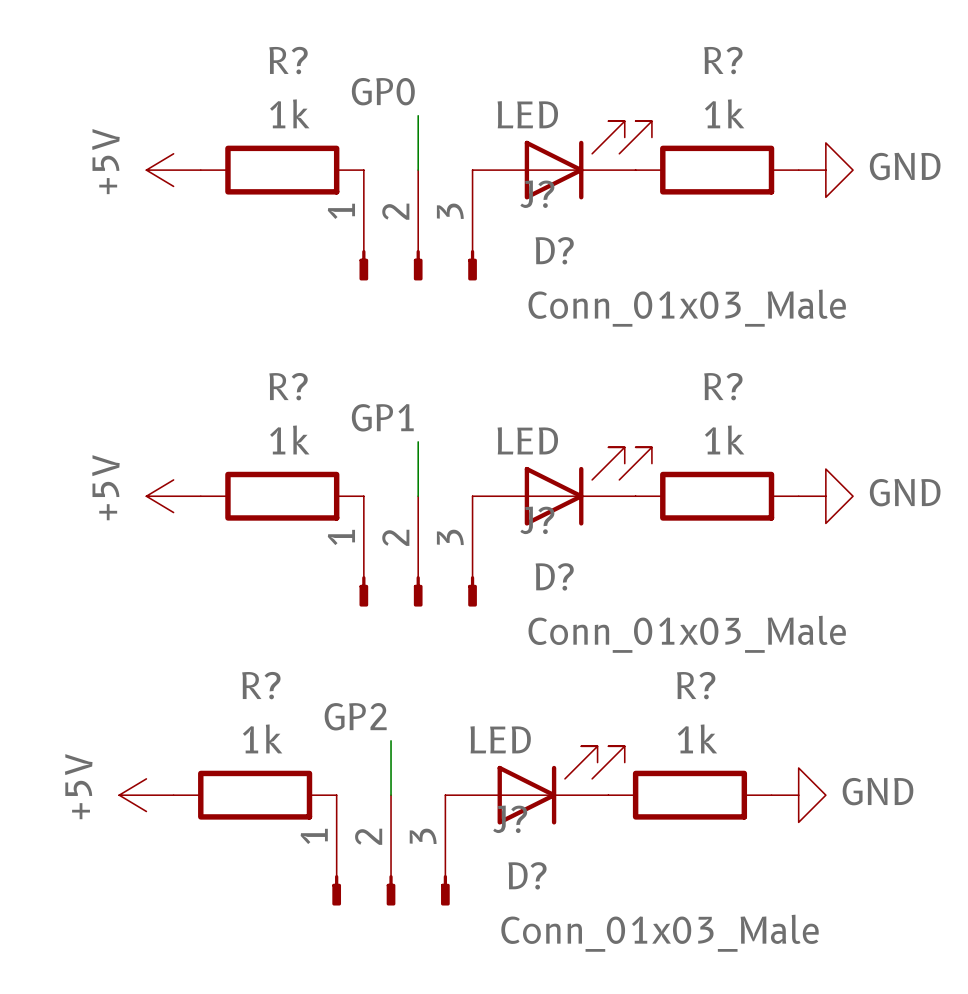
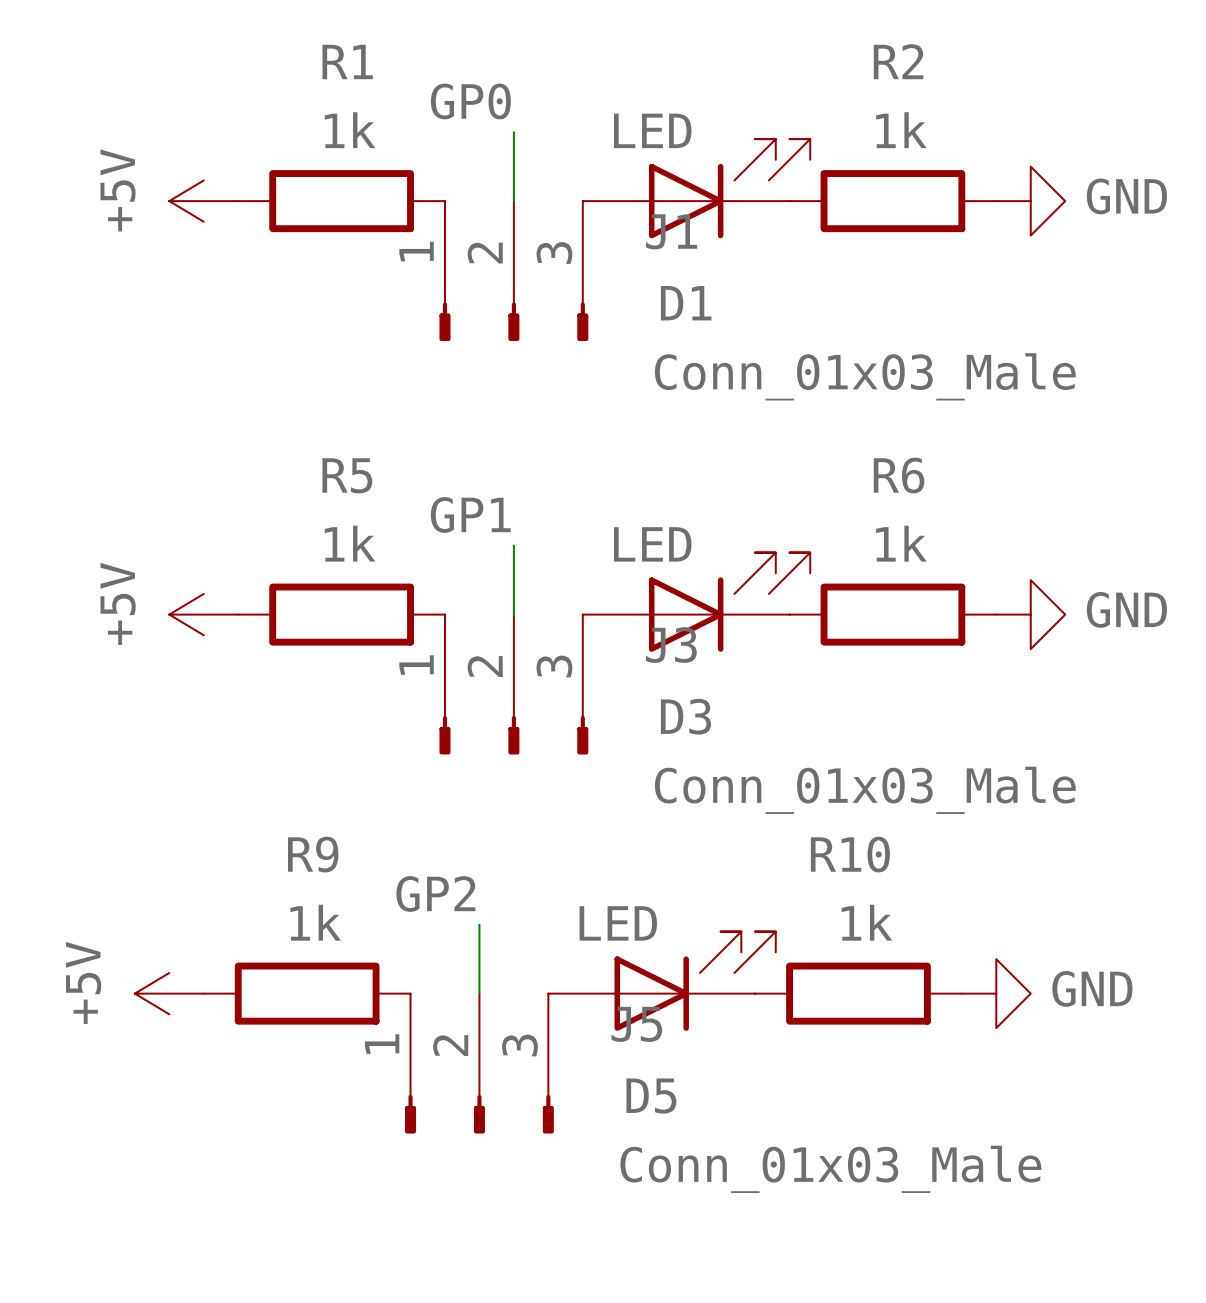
R? name: R? (288, 60) -> R1 (347, 61)
R? name: R? (723, 60) -> R2 (898, 61)
J? name: J? (537, 194) -> J1 (671, 231)
D? name: D? (554, 250) -> D1 (686, 303)
R? name: R? (288, 386) -> R5 (347, 475)
R? name: R? (723, 386) -> R6 (899, 475)
J? name: J? (537, 520) -> J3 (671, 645)
D? name: D? (554, 576) -> D3 (685, 716)
R? name: R? (261, 685) -> R9 (313, 854)
R? name: R? (696, 685) -> R10 (850, 854)
J? name: J? (510, 819) -> J5 (636, 1024)
D? name: D? (527, 875) -> D5 (651, 1096)

